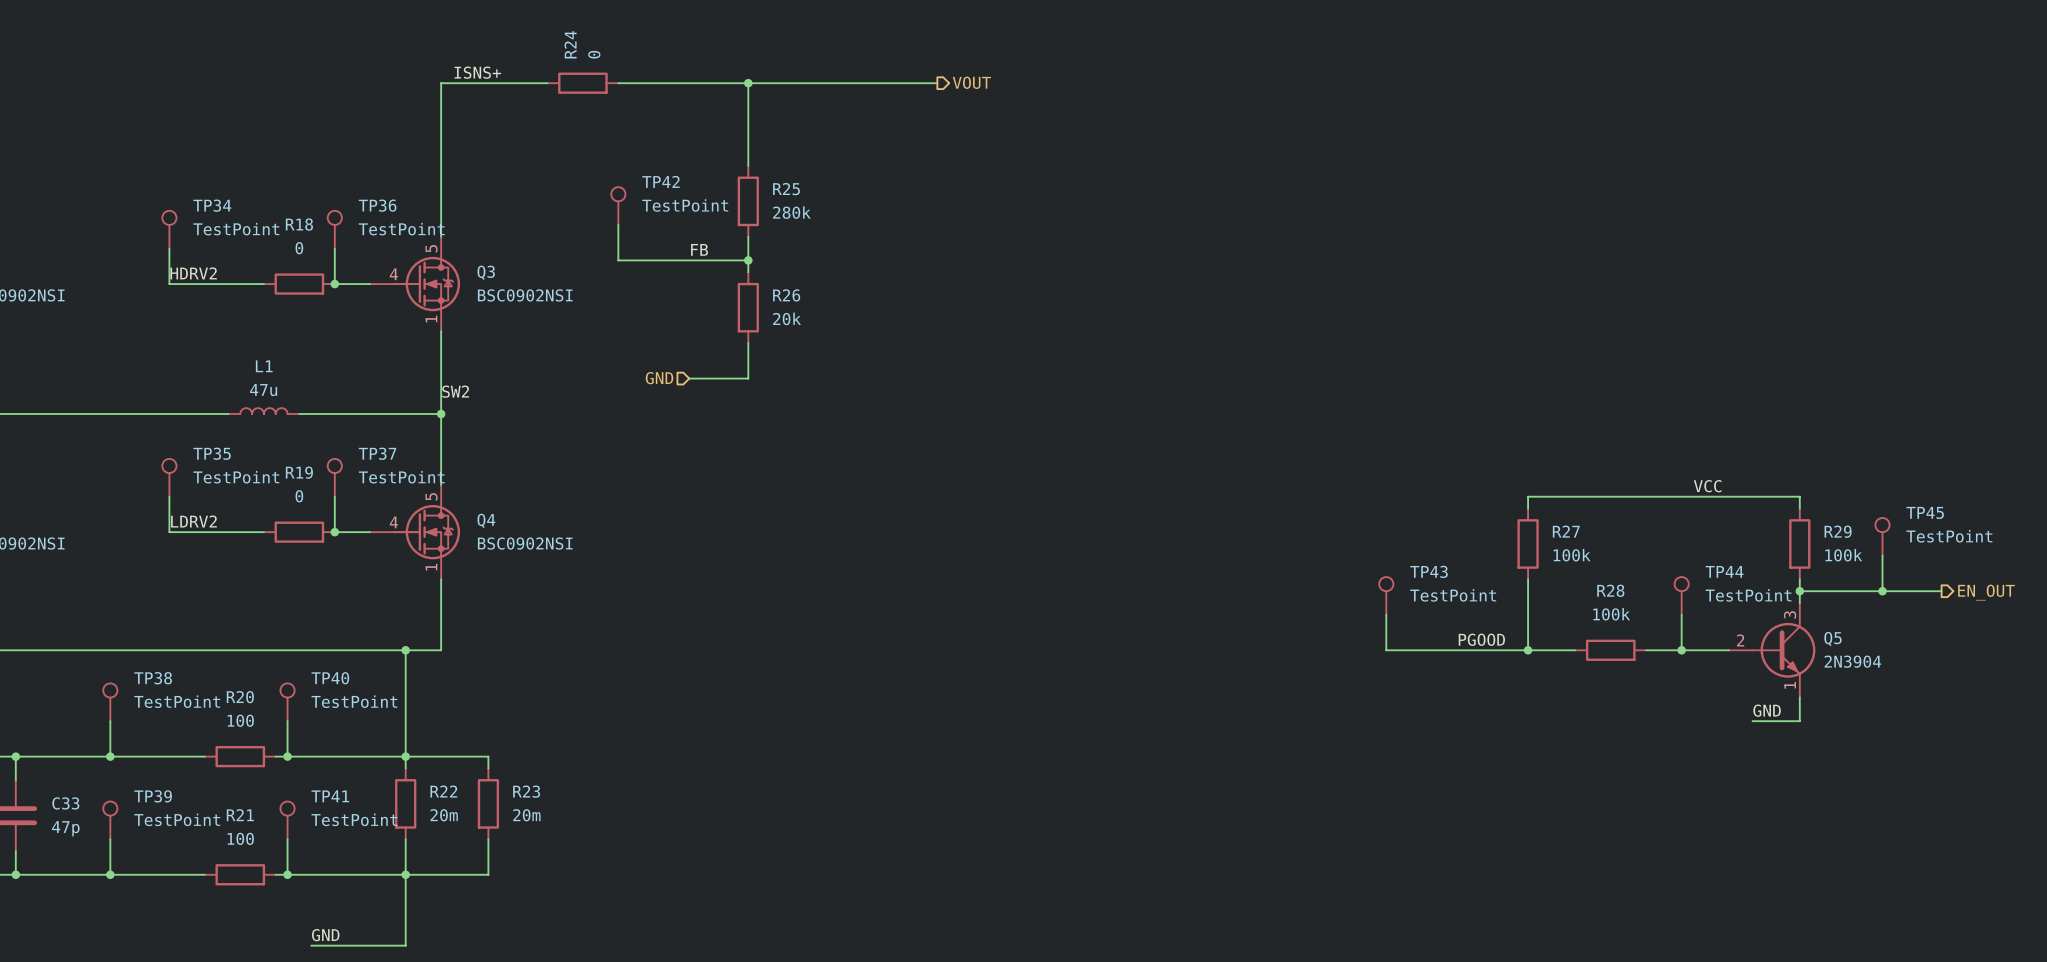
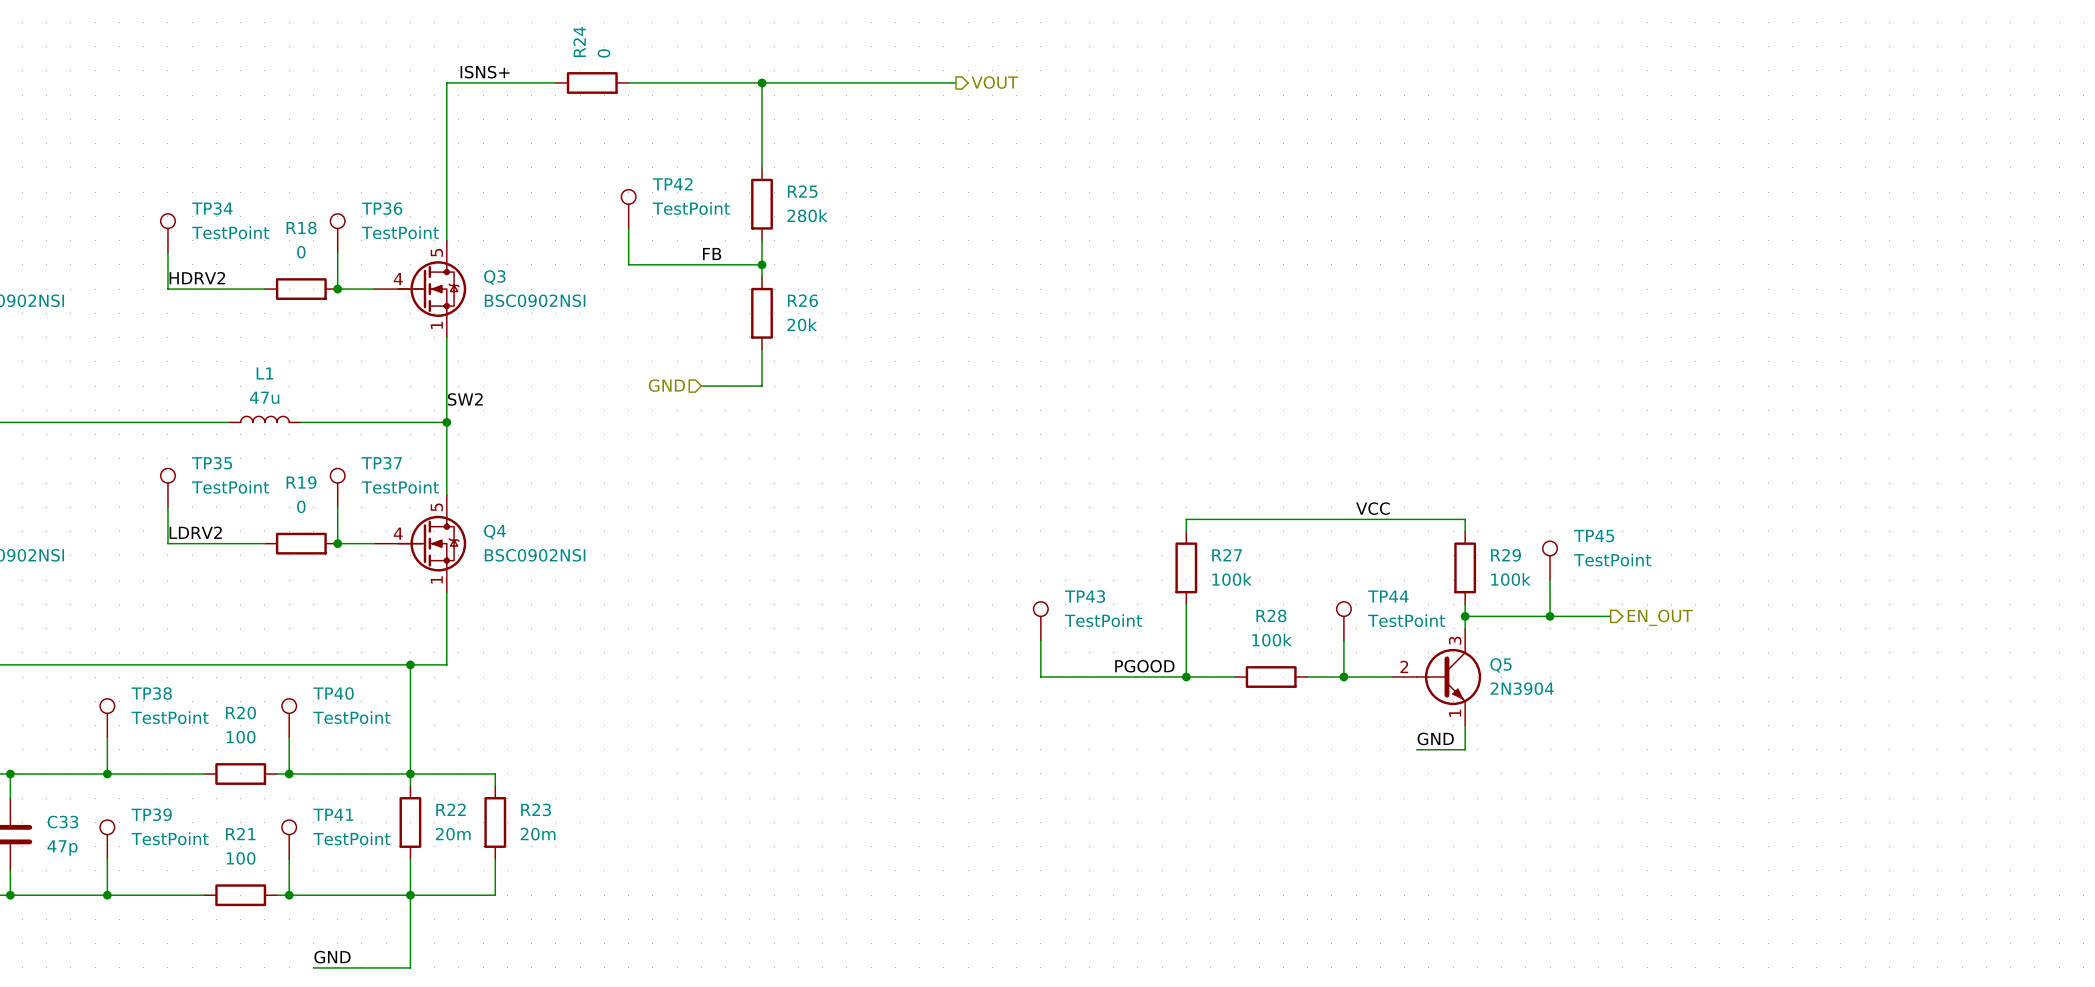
label: VCC (1707, 486) -> none
label: none -> VCC (1372, 508)
wire: (1528, 508) (1528, 496) (1799, 496) (1799, 508) -> none
wire: none -> (1186, 531) (1186, 519) (1465, 519) (1465, 531)
TP45 position: (1882, 536) -> (1550, 560)
R27 position: (1528, 543) -> (1186, 567)
R29 position: (1799, 543) -> (1465, 567)
wire: (1882, 555) (1882, 591) -> none
wire: (1528, 579) (1528, 650) -> none
wire: (1799, 579) (1799, 603) -> none
wire: none -> (1186, 604) (1186, 677)
wire: none -> (1465, 604) (1465, 628)
wire: (1799, 591) (1941, 591) -> none
junction: (1799, 591) -> none
junction: (1882, 591) -> none
hierarchical label: EN_OUT (1986, 592) -> none
TP43 position: (1386, 595) -> (1040, 621)
TP44 position: (1681, 595) -> (1343, 621)
wire: none -> (1465, 616) (1610, 616)
junction: none -> (1465, 616)
hierarchical label: none -> EN_OUT (1660, 617)
wire: (1386, 614) (1386, 650) (1575, 650) -> none
wire: (1681, 614) (1681, 650) -> (1550, 580) (1550, 616)
wire: none -> (1040, 640) (1040, 677) (1234, 677)
wire: none -> (1343, 640) (1343, 677)
label: PGOOD (1481, 639) -> none
junction position: (1528, 650) -> (1550, 616)
R28 position: (1610, 650) -> (1271, 677)
wire: (1646, 650) (1728, 650) -> none
junction: (1681, 650) -> none
Q5 position: (1772, 650) -> (1436, 677)
label: none -> PGOOD (1144, 666)
junction: none -> (1186, 677)
wire: none -> (1307, 677) (1392, 677)
junction: none -> (1343, 677)
wire: (1799, 697) (1799, 721) (1752, 721) -> none
wire: none -> (1465, 725) (1465, 749) (1416, 749)
label: GND (1767, 710) -> none
label: none -> GND (1435, 738)

